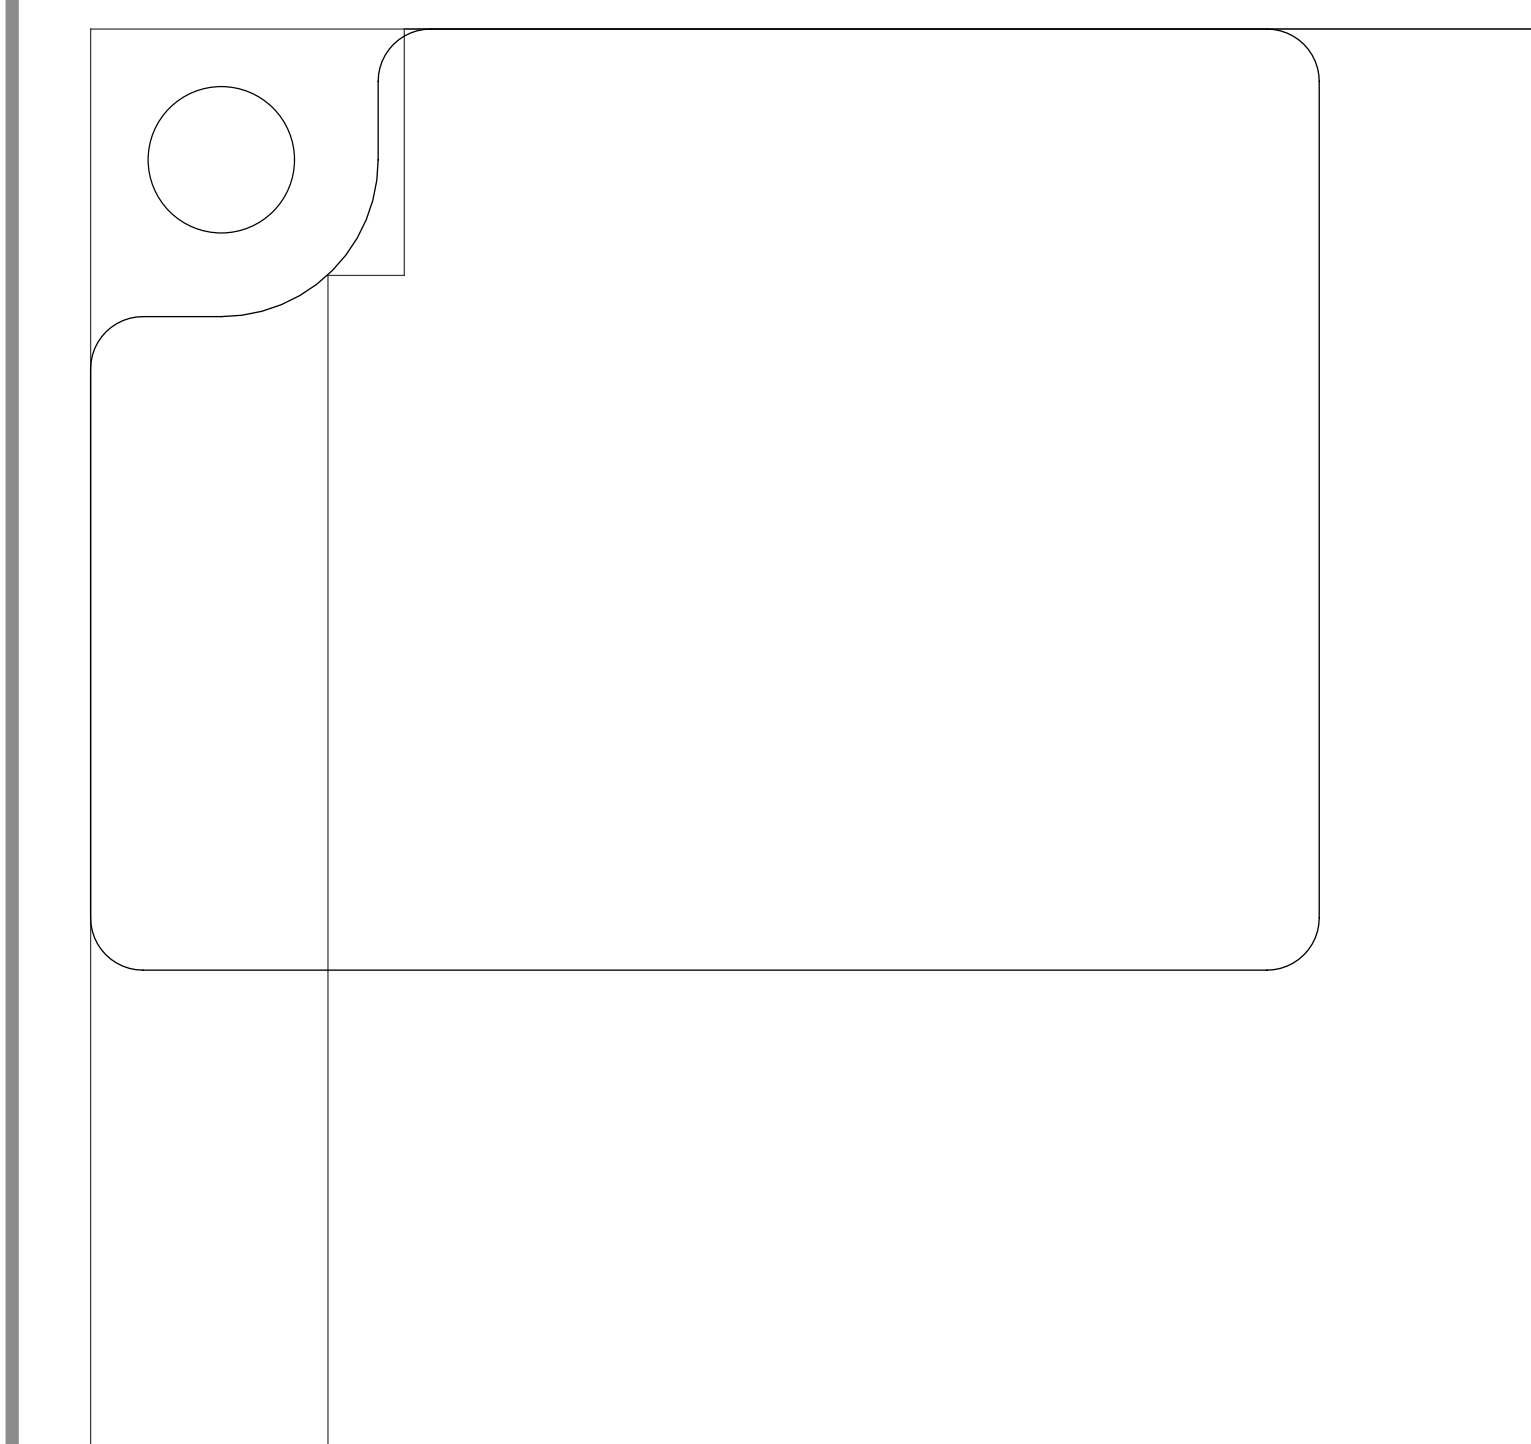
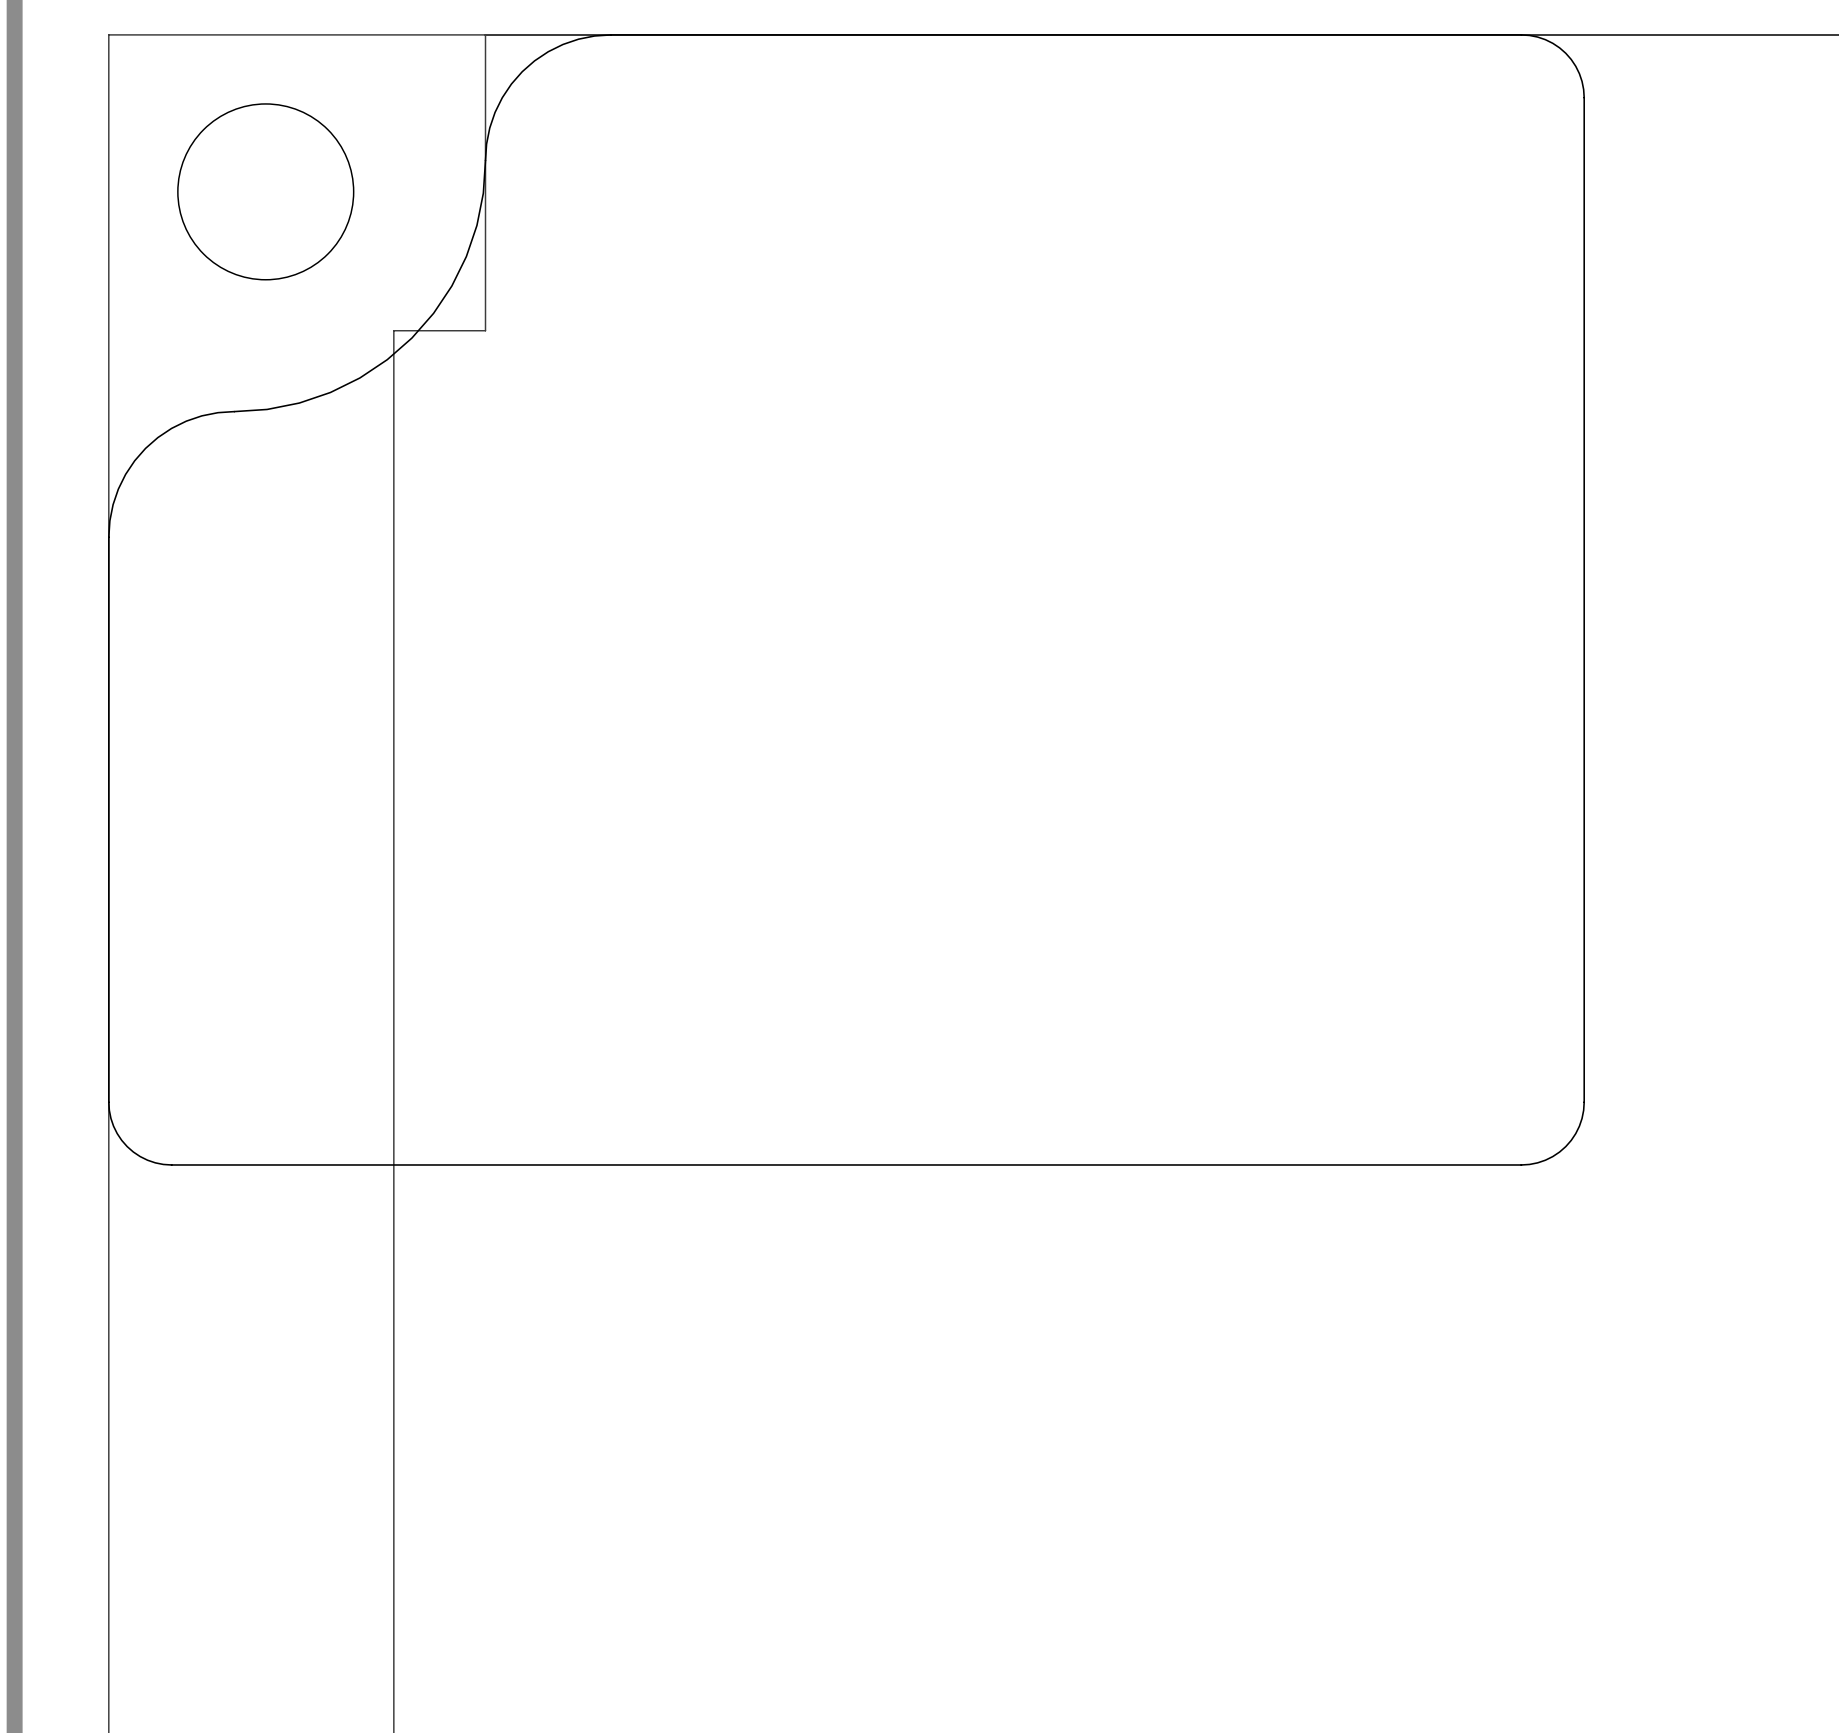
board edge: (508, 29) (423, 29) (410, 33) (393, 44) (382, 61) (378, 74) (378, 159) (372, 200) (357, 238) (345, 255) (316, 284) (299, 295) (261, 311) (221, 316) (136, 317) (122, 320) (111, 327) (97, 342) (91, 362) (90, 447) -> (611, 34) (578, 39) (548, 51) (522, 71) (502, 97) (489, 127) (486, 144) (483, 193) (476, 225) (466, 256) (451, 286) (433, 313) (411, 338) (387, 359) (359, 377) (330, 392) (299, 403) (267, 409) (217, 412) (201, 415) (171, 428) (145, 448) (125, 474) (113, 504) (108, 537)

